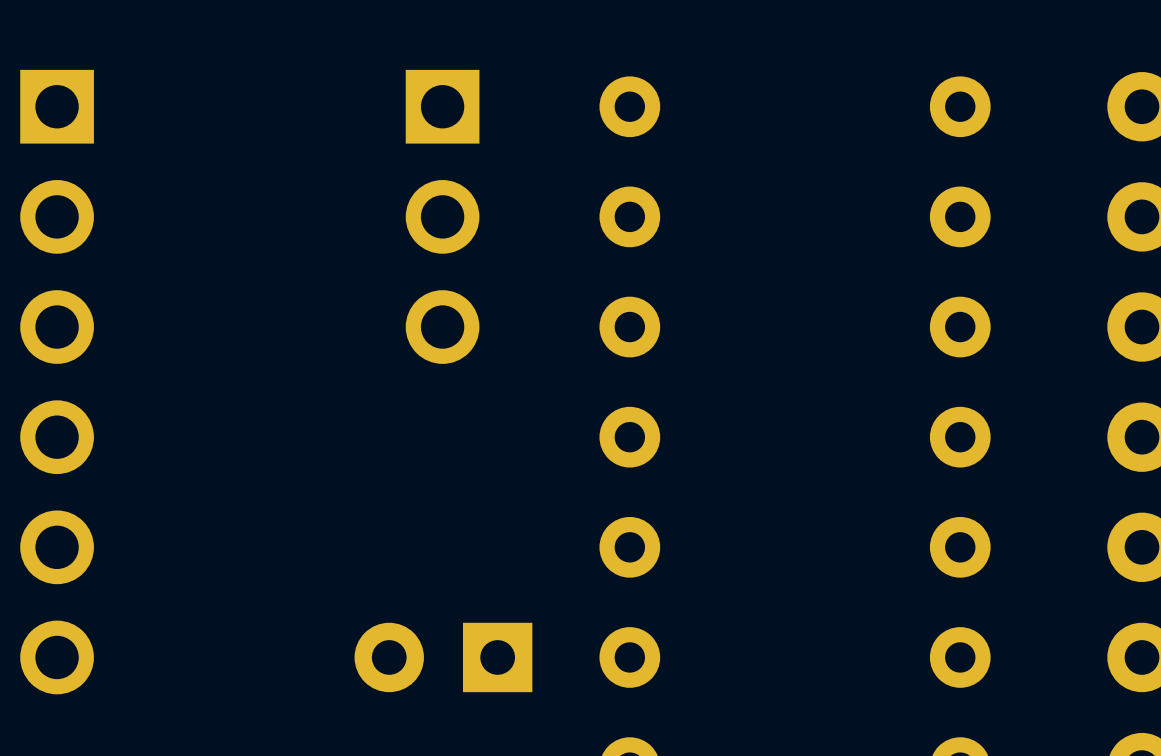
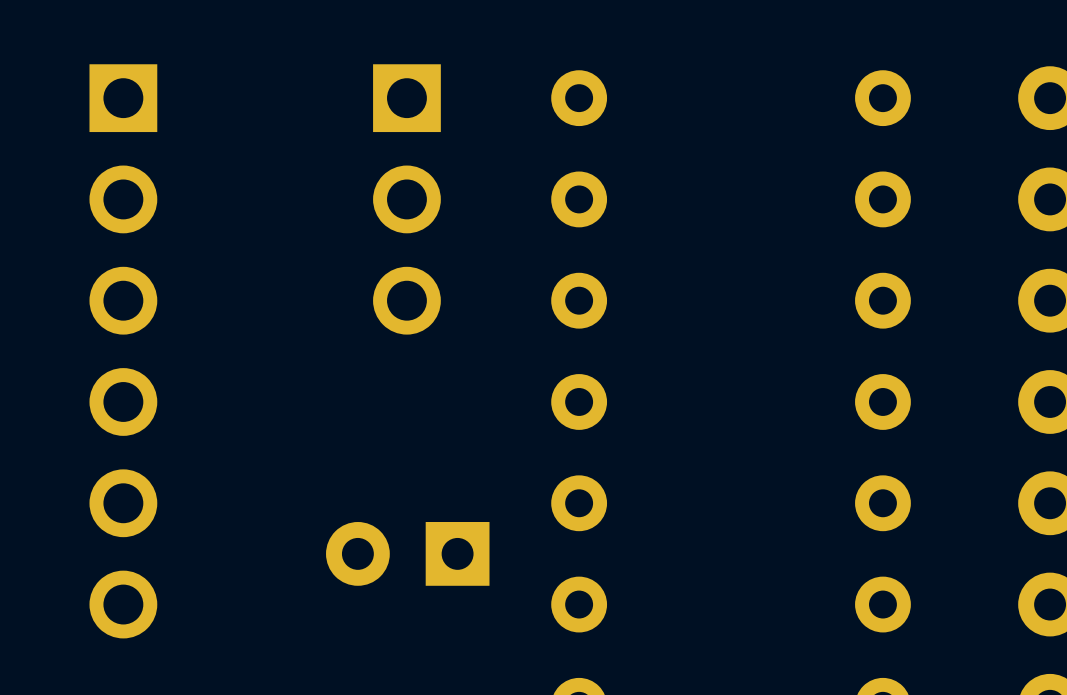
part position: (57, 382) -> (123, 351)
part position: (443, 657) -> (407, 553)

